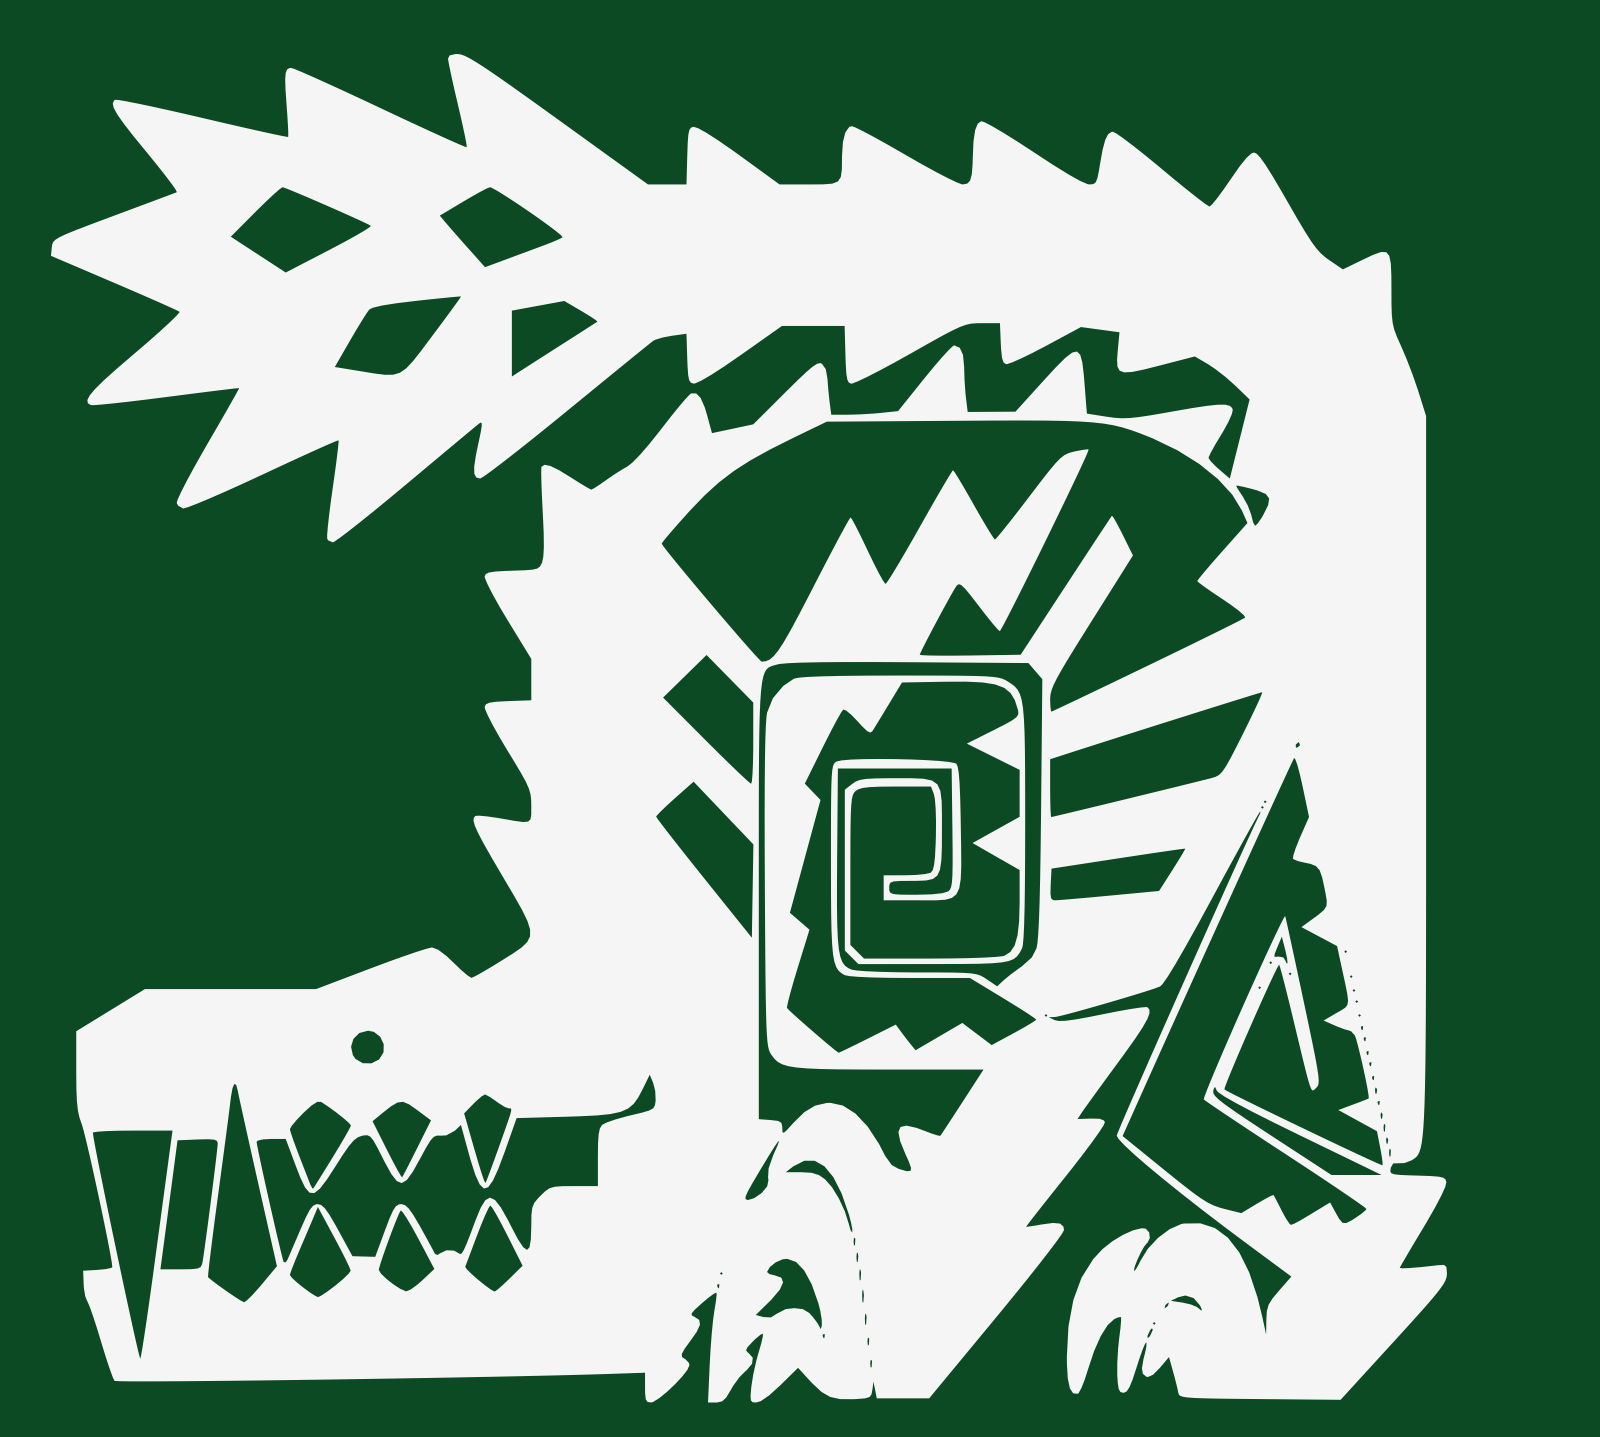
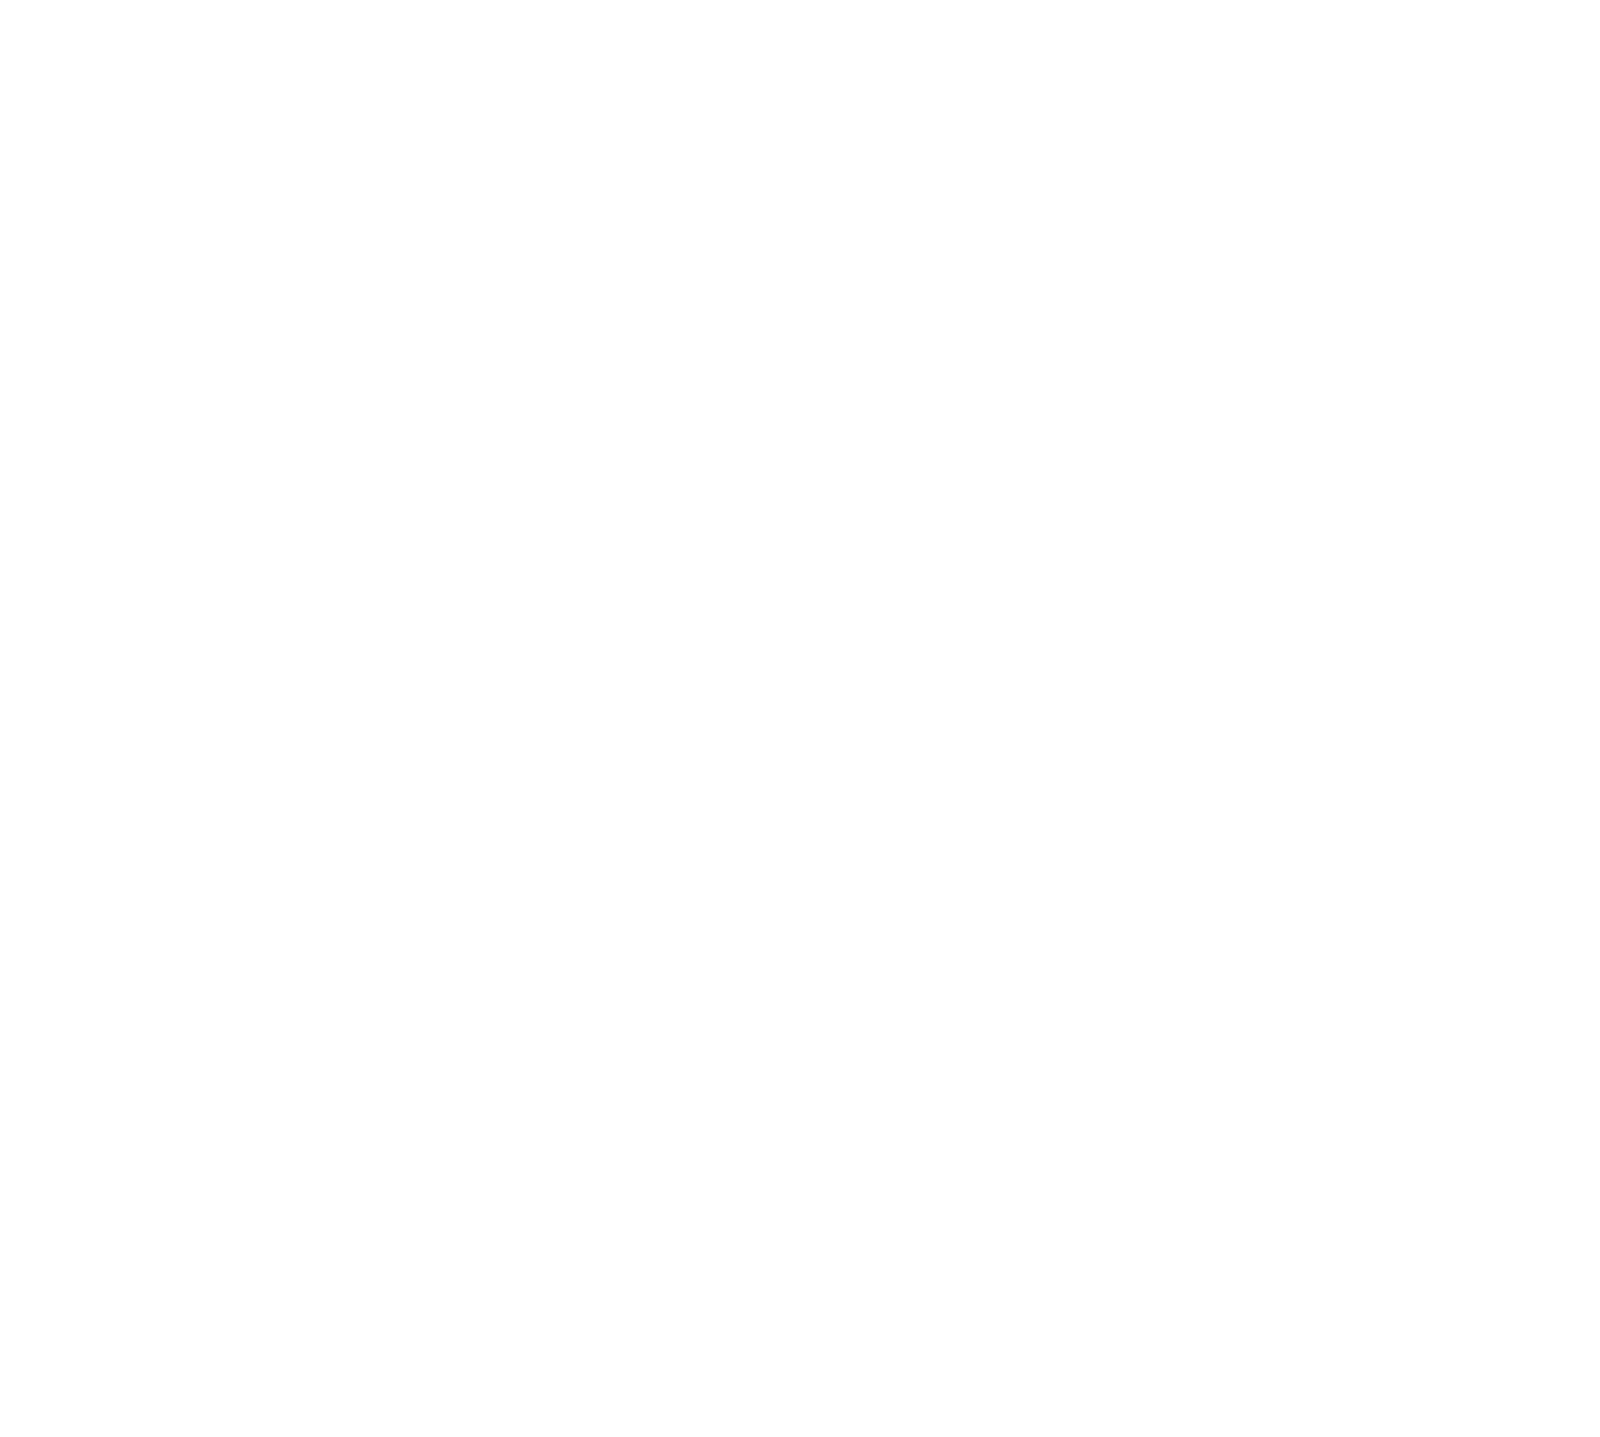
drawing: [50, 54, 1447, 1403] -> none

